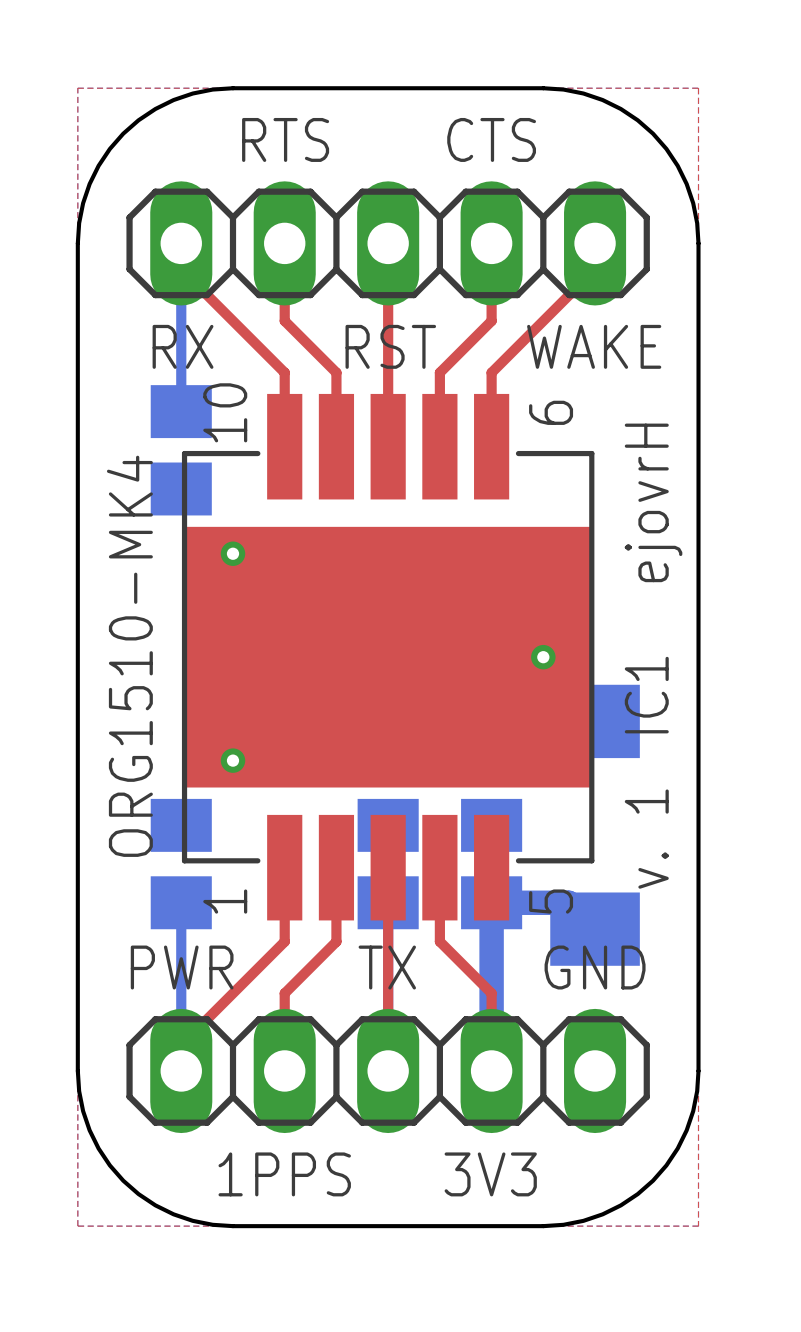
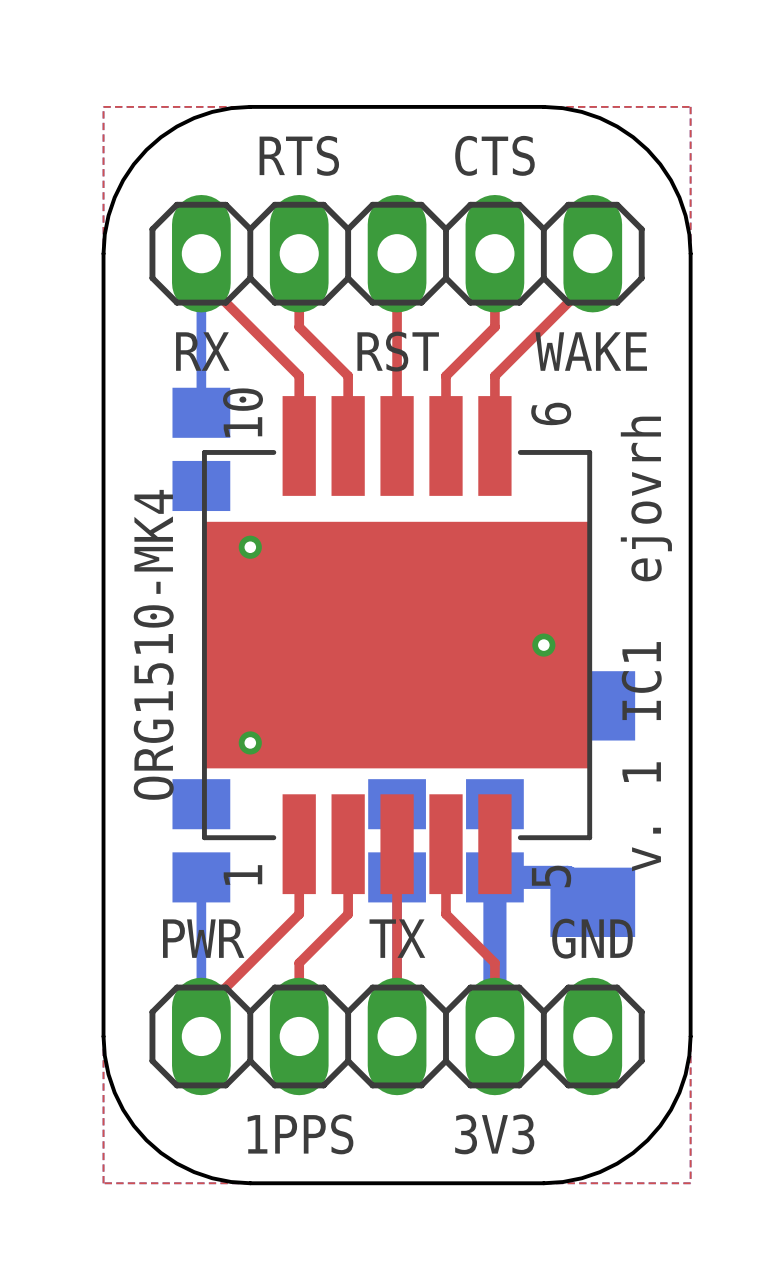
text: ejovrH (653, 502) -> ejovrh (646, 499)

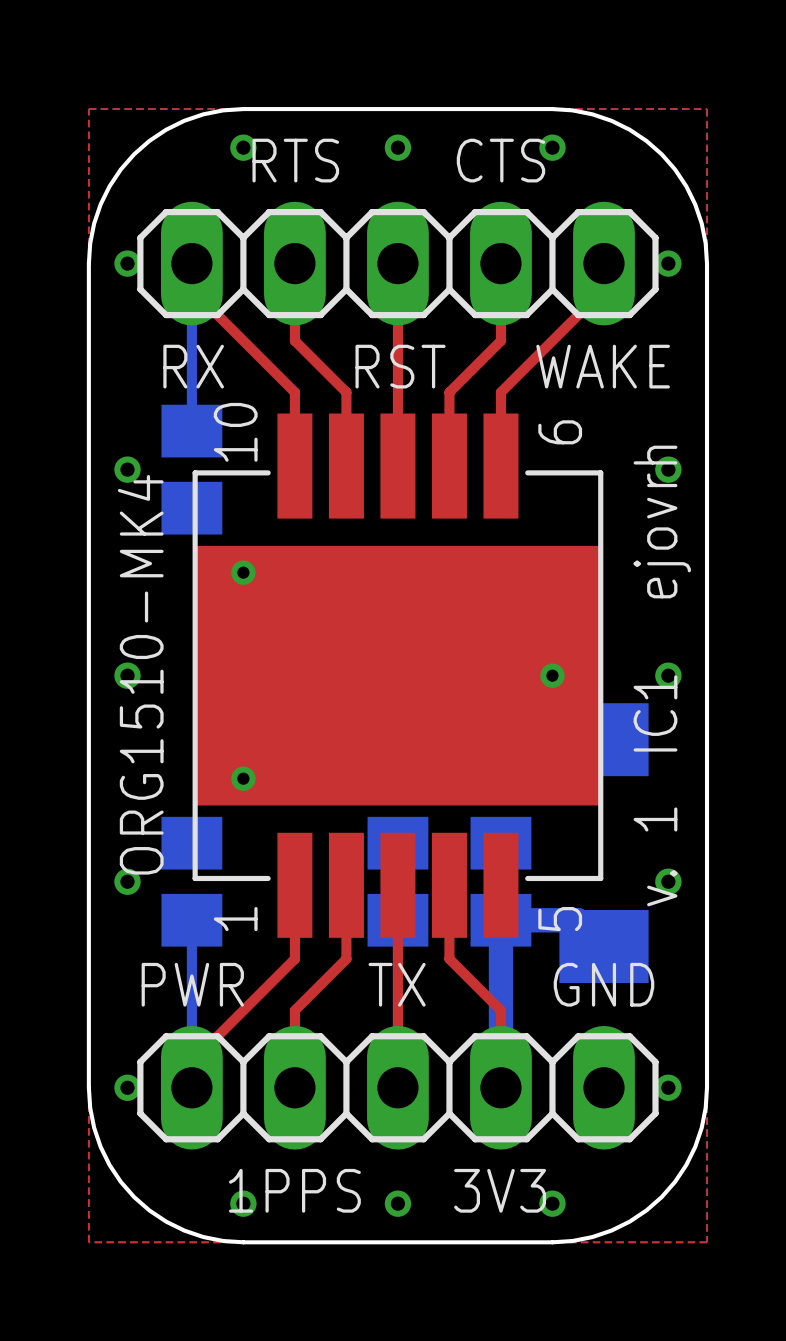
via: none -> (243, 147)
via: none -> (397, 147)
via: none -> (552, 147)
via: none -> (127, 263)
via: none -> (668, 263)
via: none -> (127, 469)
via: none -> (668, 469)
via: none -> (127, 675)
via: none -> (668, 675)
via: none -> (127, 881)
via: none -> (668, 881)
via: none -> (127, 1087)
via: none -> (668, 1087)
via: none -> (243, 1203)
via: none -> (397, 1203)
via: none -> (552, 1203)

